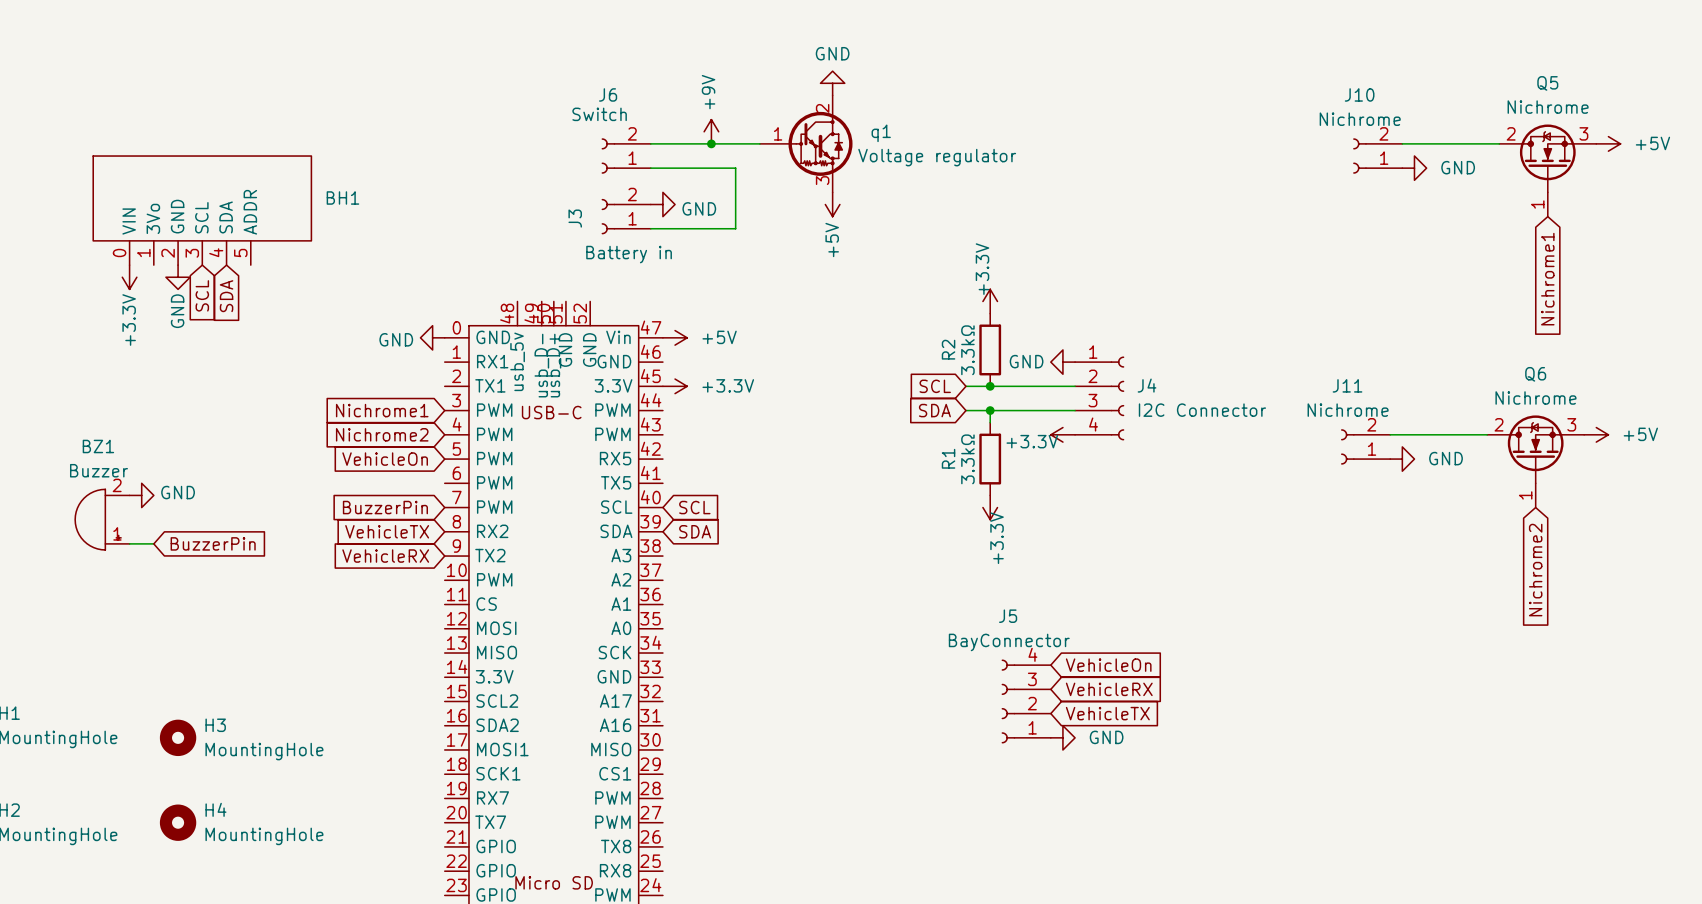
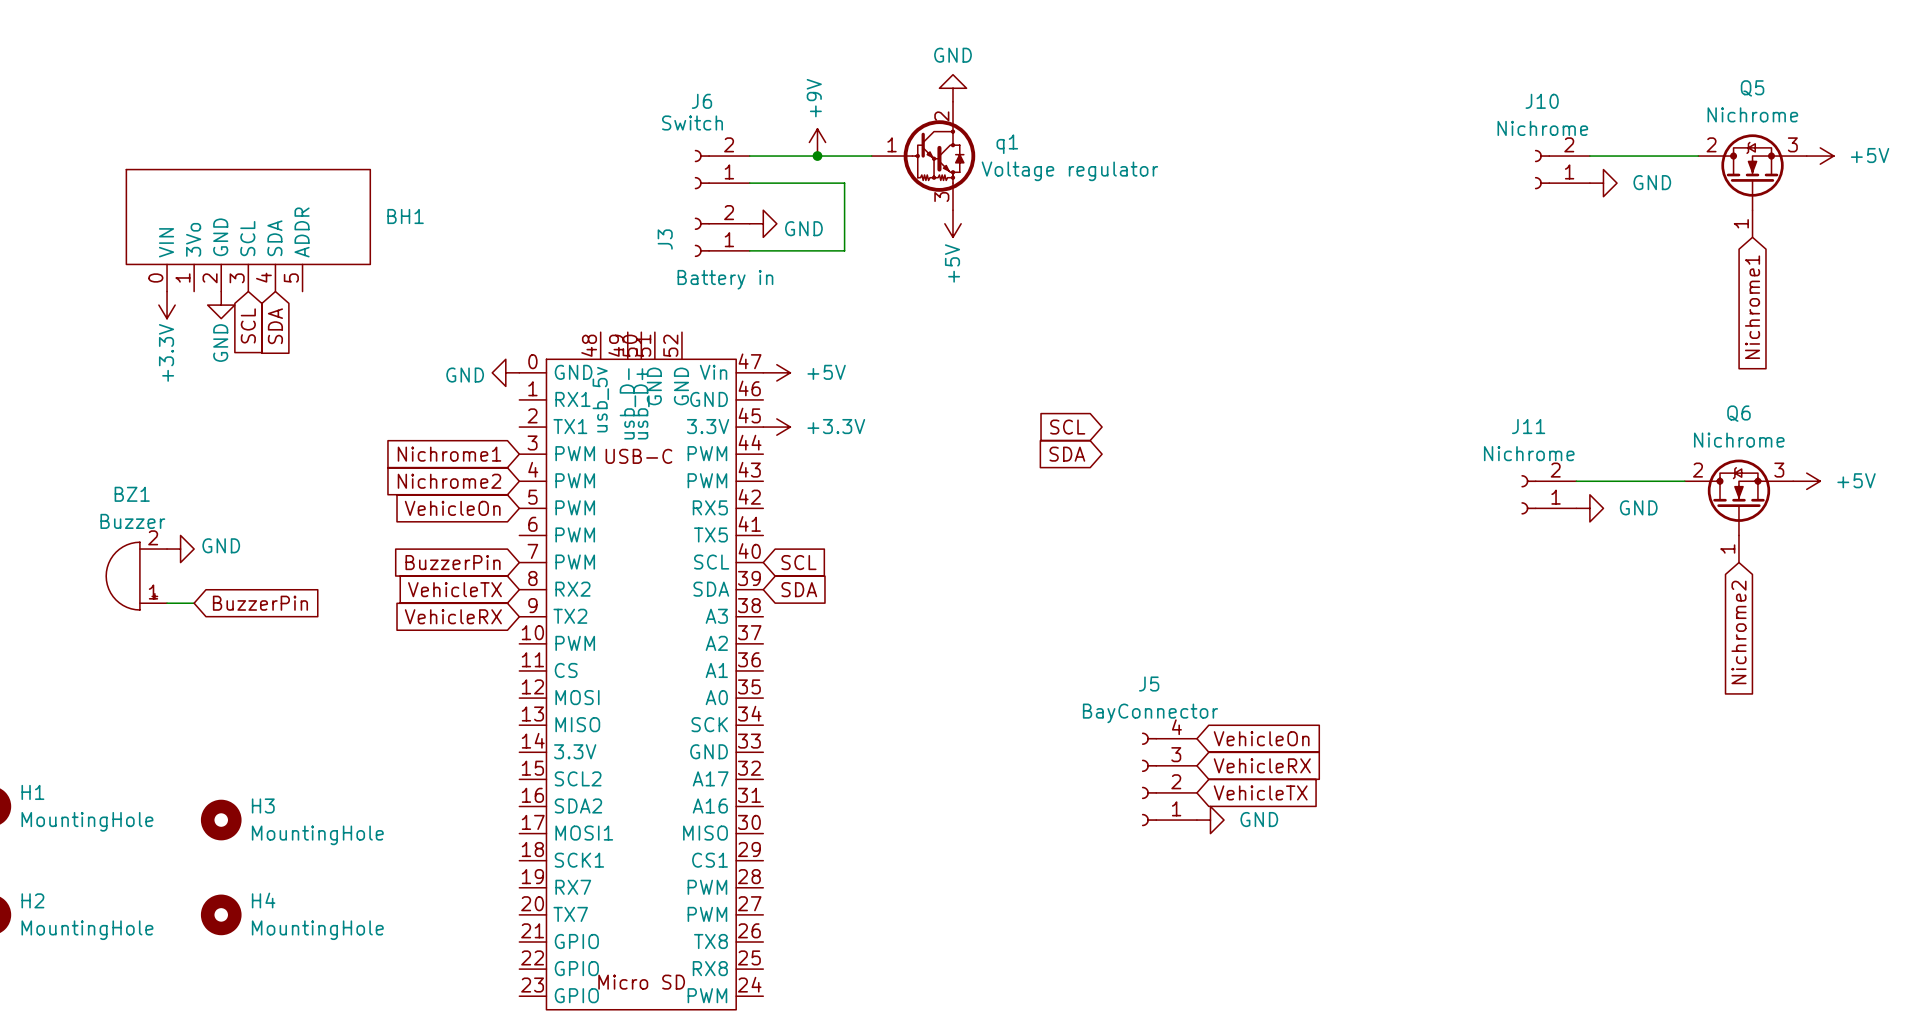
power symbol: +3.3V (990, 301) -> none
R2: 3.3kΩ (990, 349) -> none
power symbol: GND (1062, 362) -> none
wire: (965, 386) (1075, 386) -> none
junction: (990, 386) -> none
J4: I2C Connector (1099, 398) -> none
wire: (965, 410) (1075, 410) -> none
wire: (990, 410) (990, 422) -> none
junction: (990, 410) -> none
power symbol: +3.3V (1062, 434) -> none
R1: 3.3kΩ (990, 459) -> none
power symbol: +3.3V (990, 507) -> none

